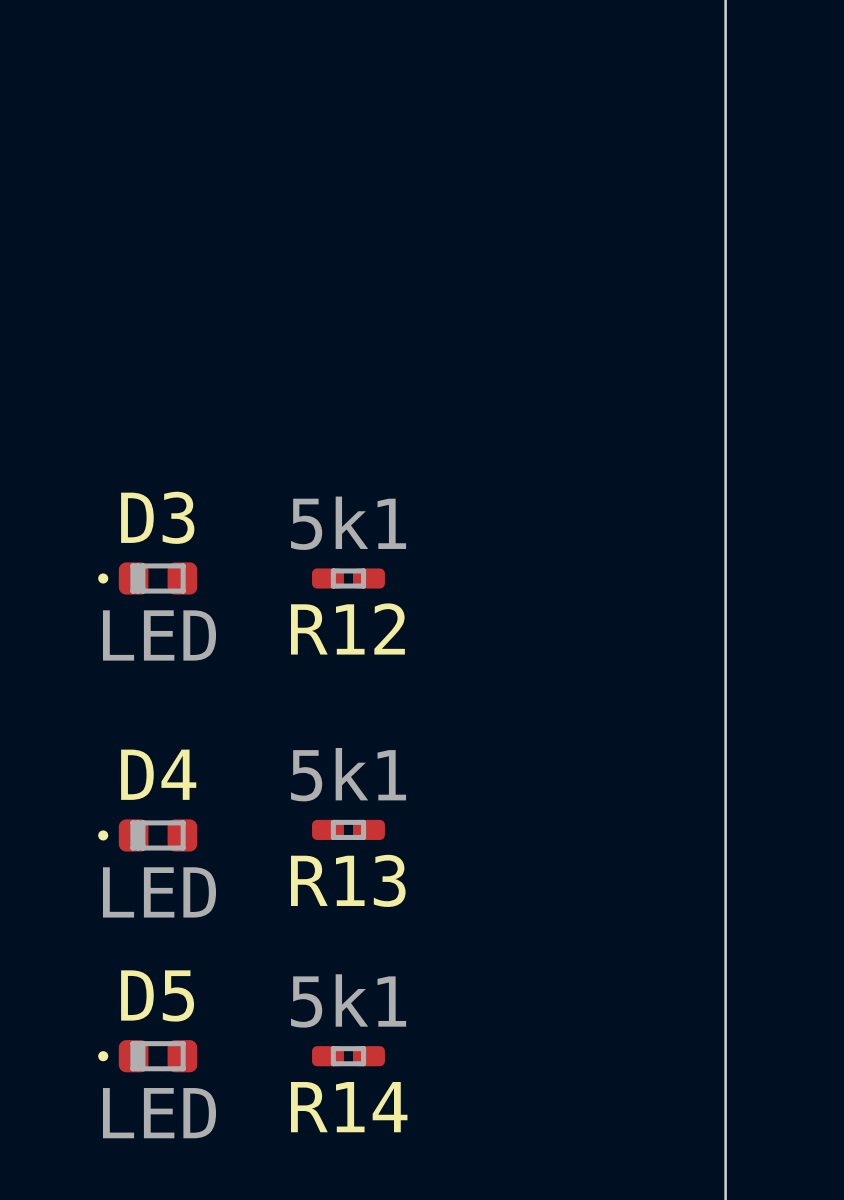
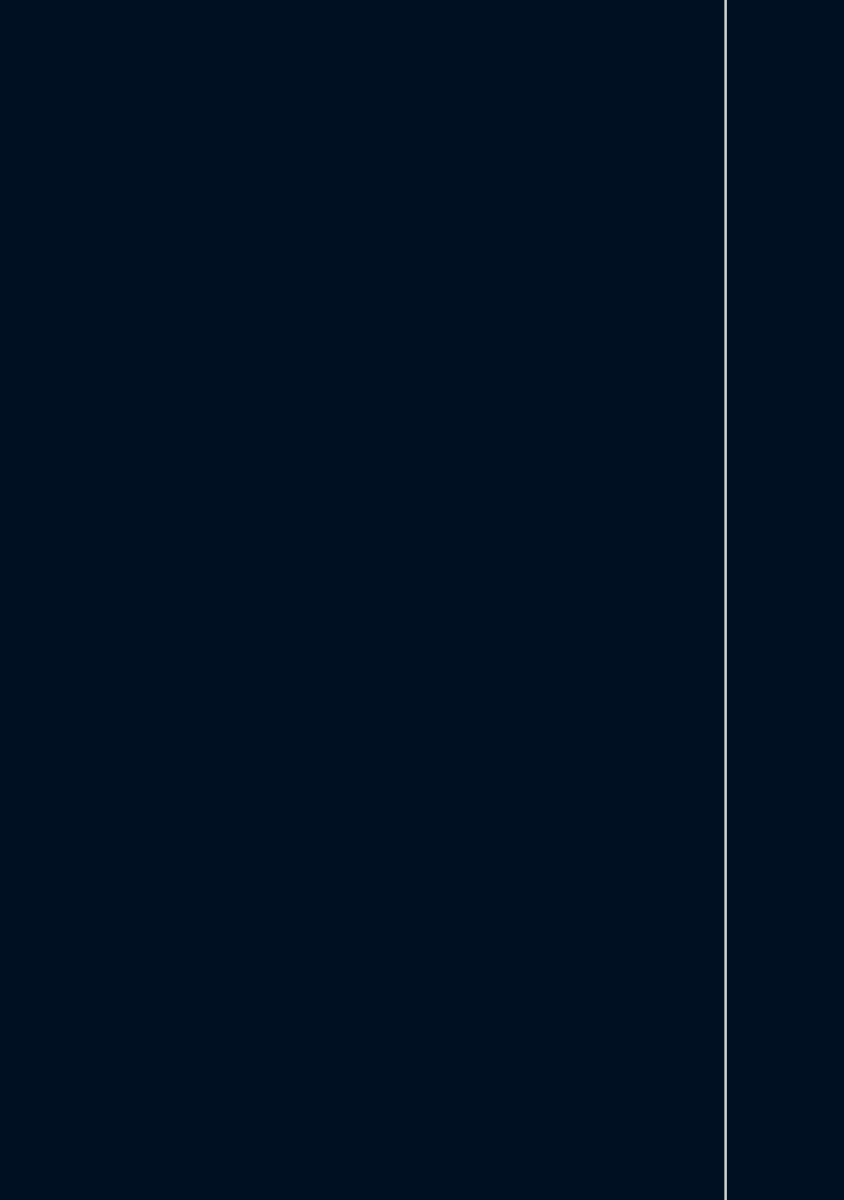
D3: LED (147, 578) -> none
R12: 5k1 (348, 578) -> none
R13: 5k1 (348, 829) -> none
D4: LED (147, 835) -> none
D5: LED (147, 1056) -> none
R14: 5k1 (348, 1056) -> none

